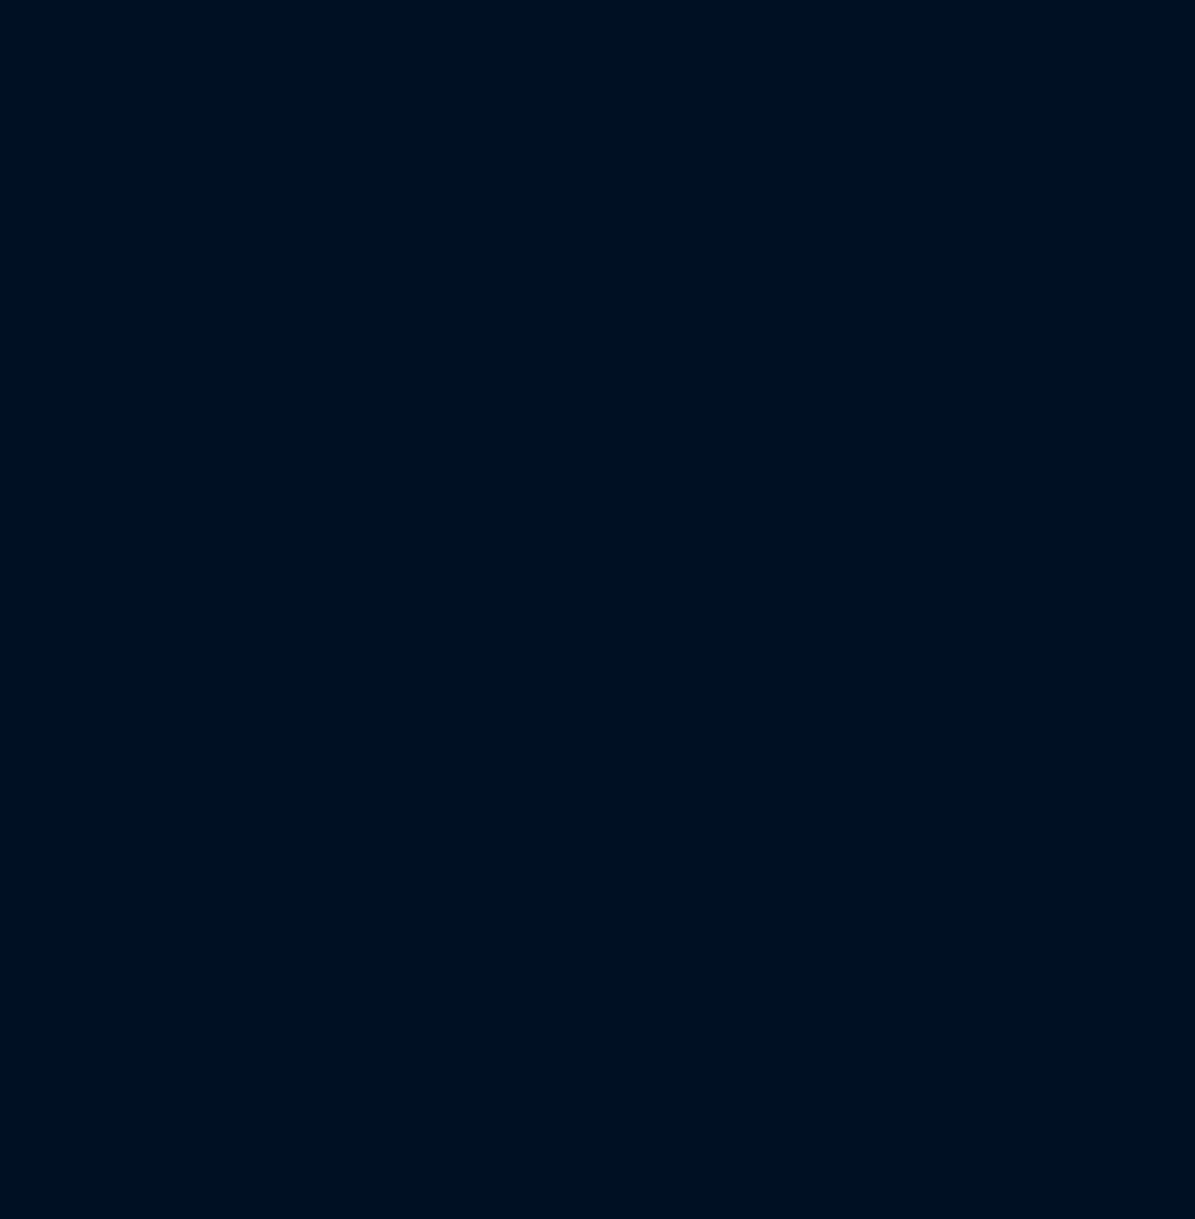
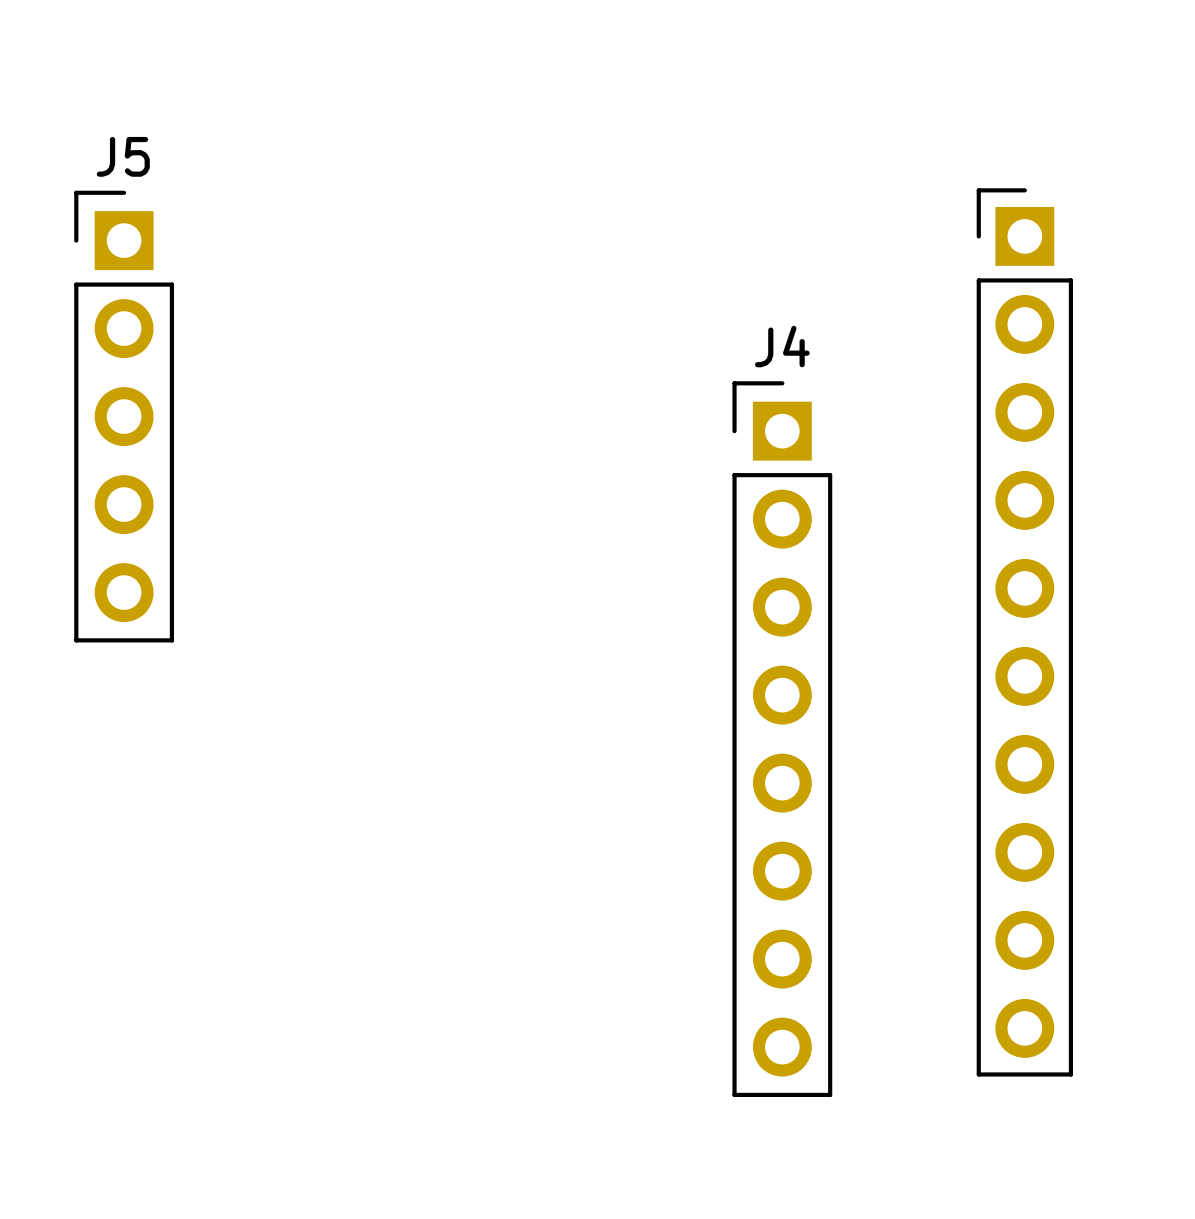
J5: none -> (124, 416)
part: none -> (1024, 632)
J4: none -> (782, 739)

